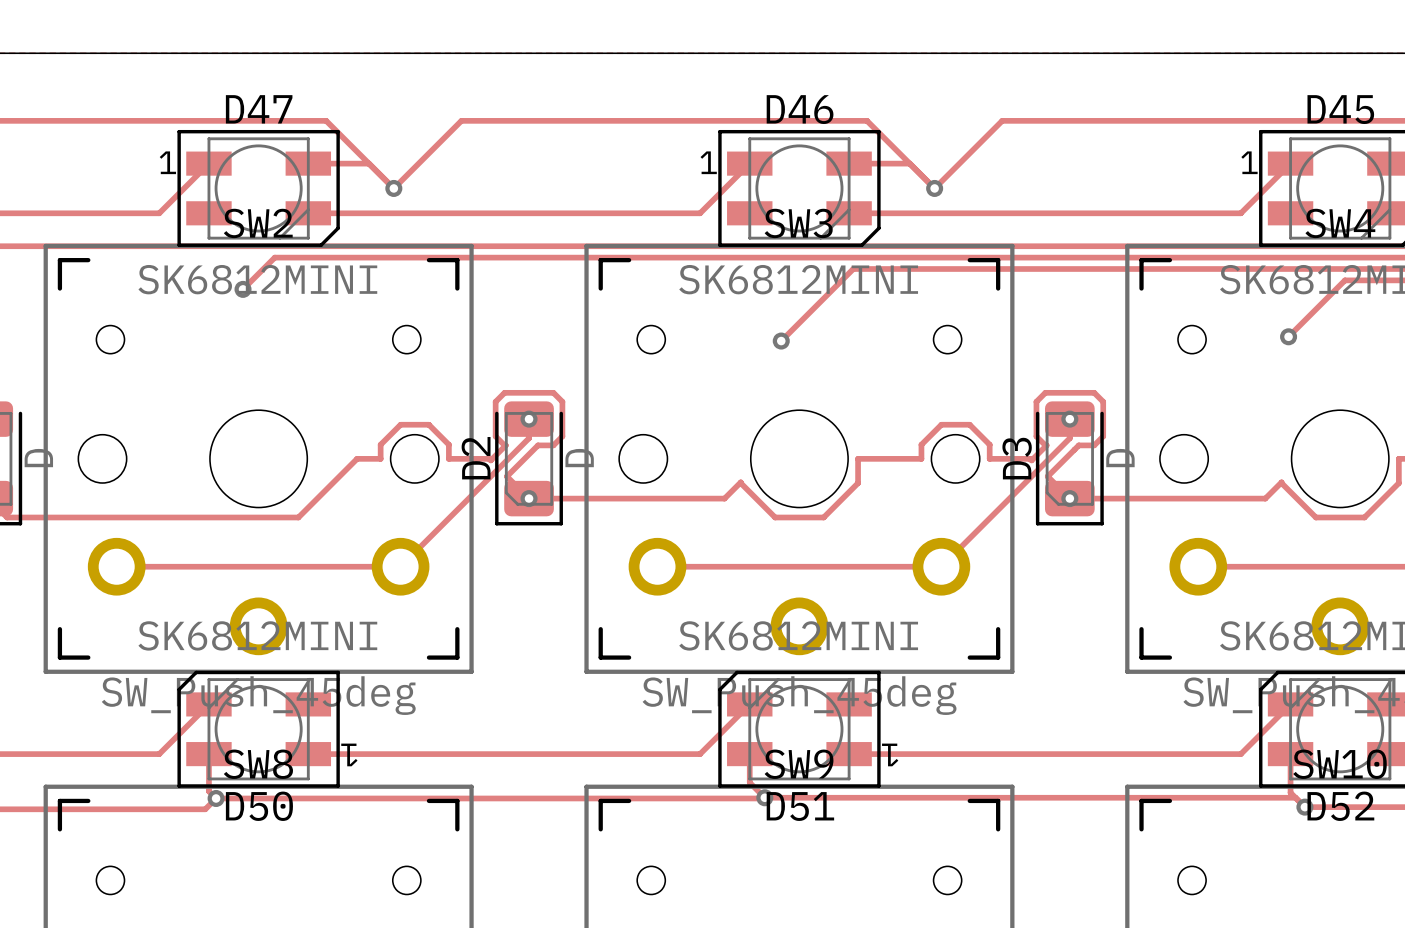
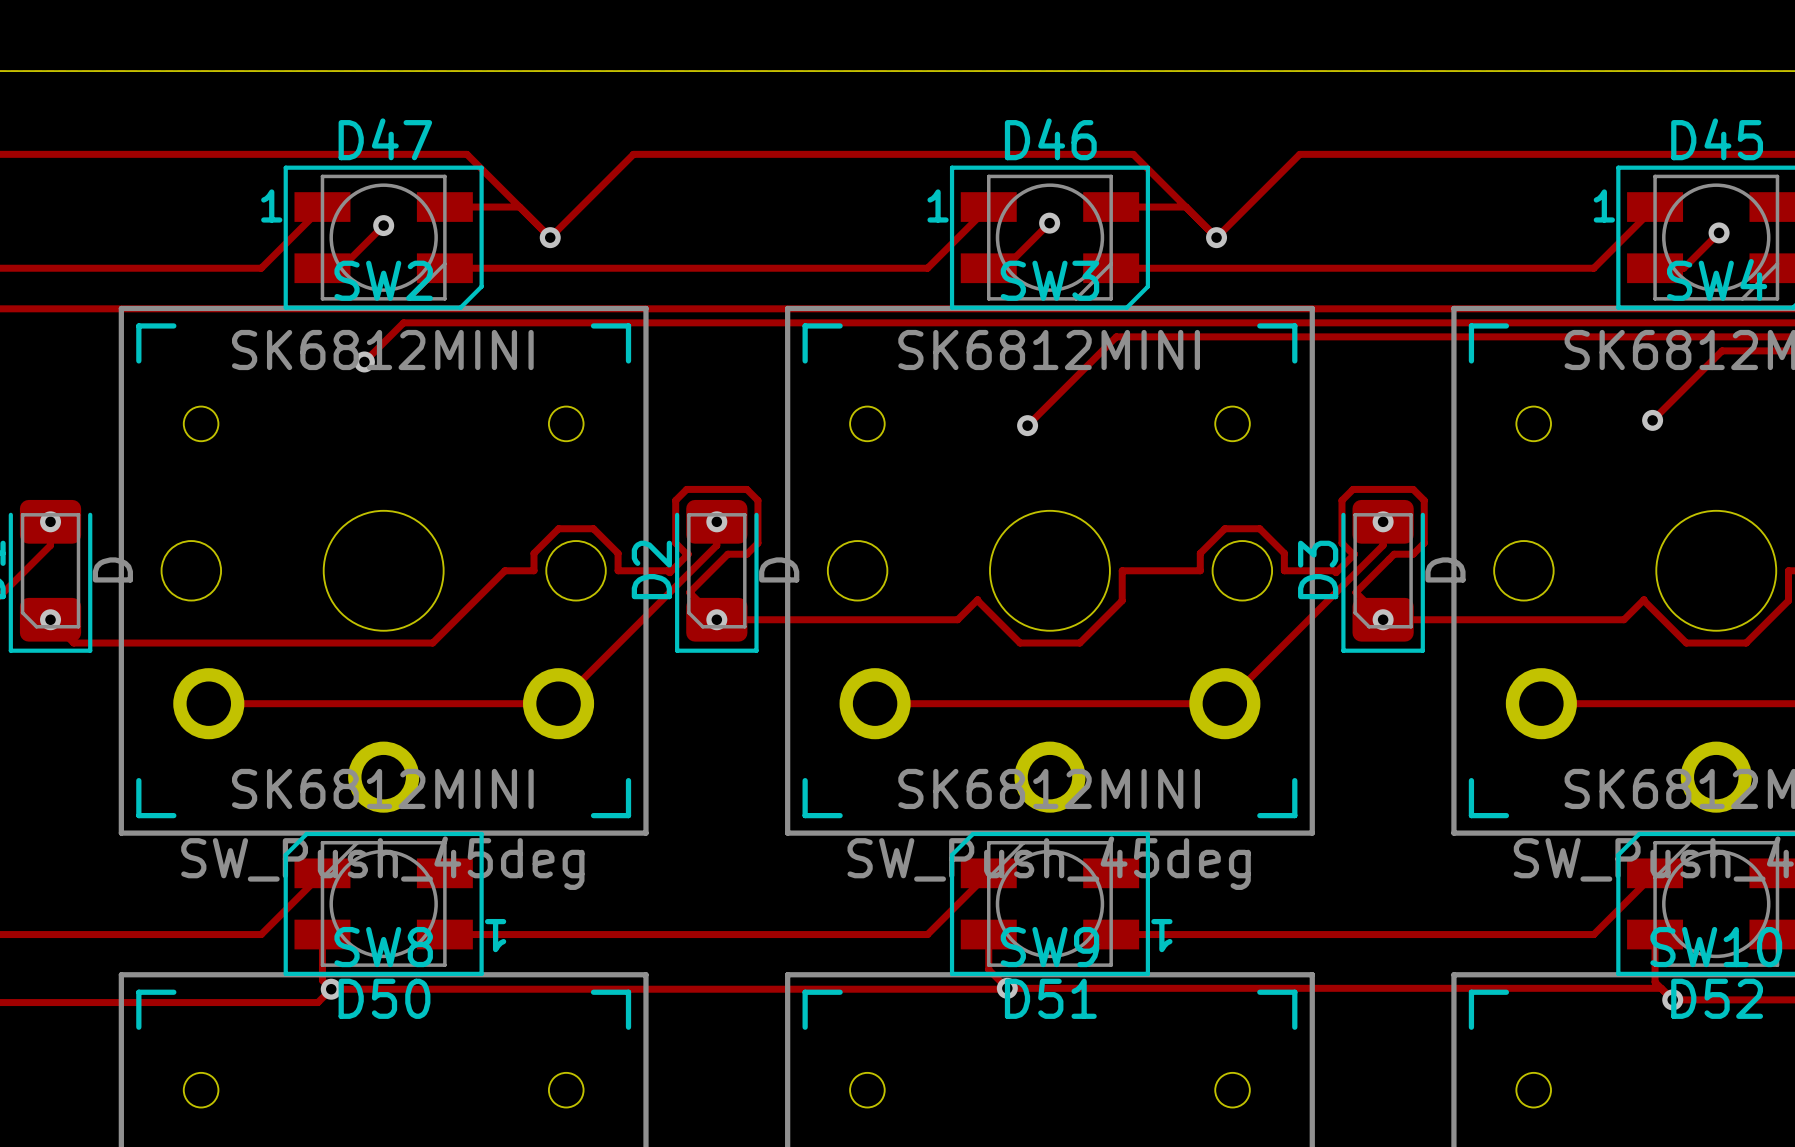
track: none -> (1049, 223) (1004, 268) (988, 268)
via: none -> (1049, 223)
track: none -> (383, 225) (341, 268) (322, 268)
via: none -> (383, 225)
track: none -> (1719, 232) (1683, 268) (1655, 268)
via: none -> (1719, 232)

